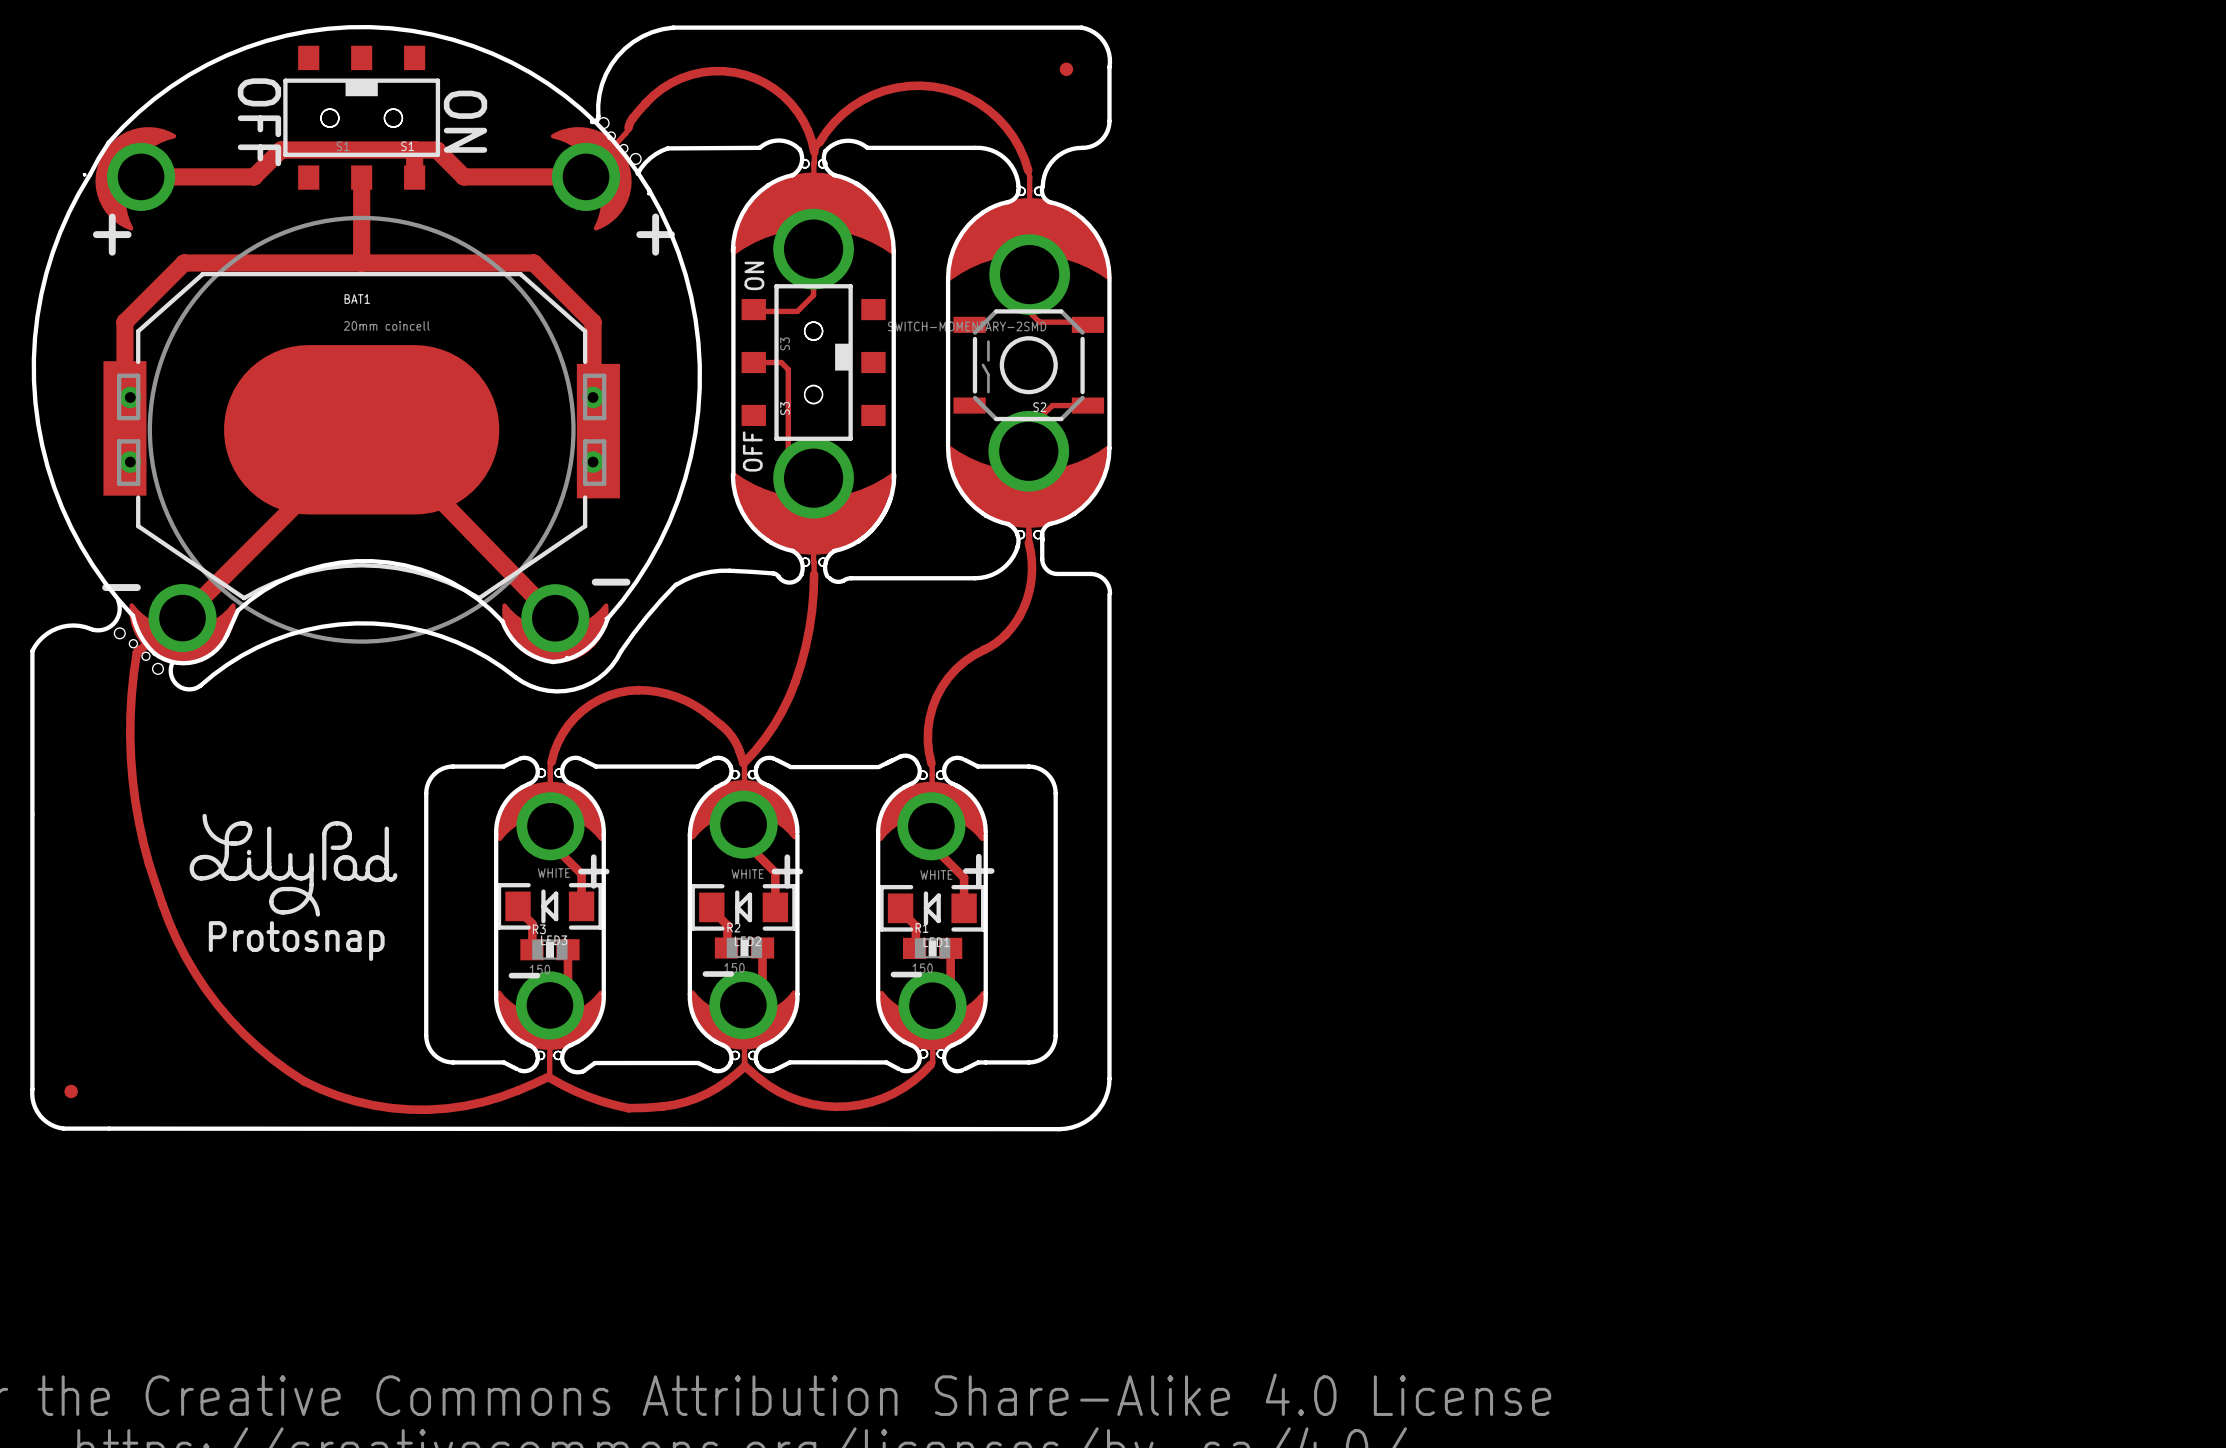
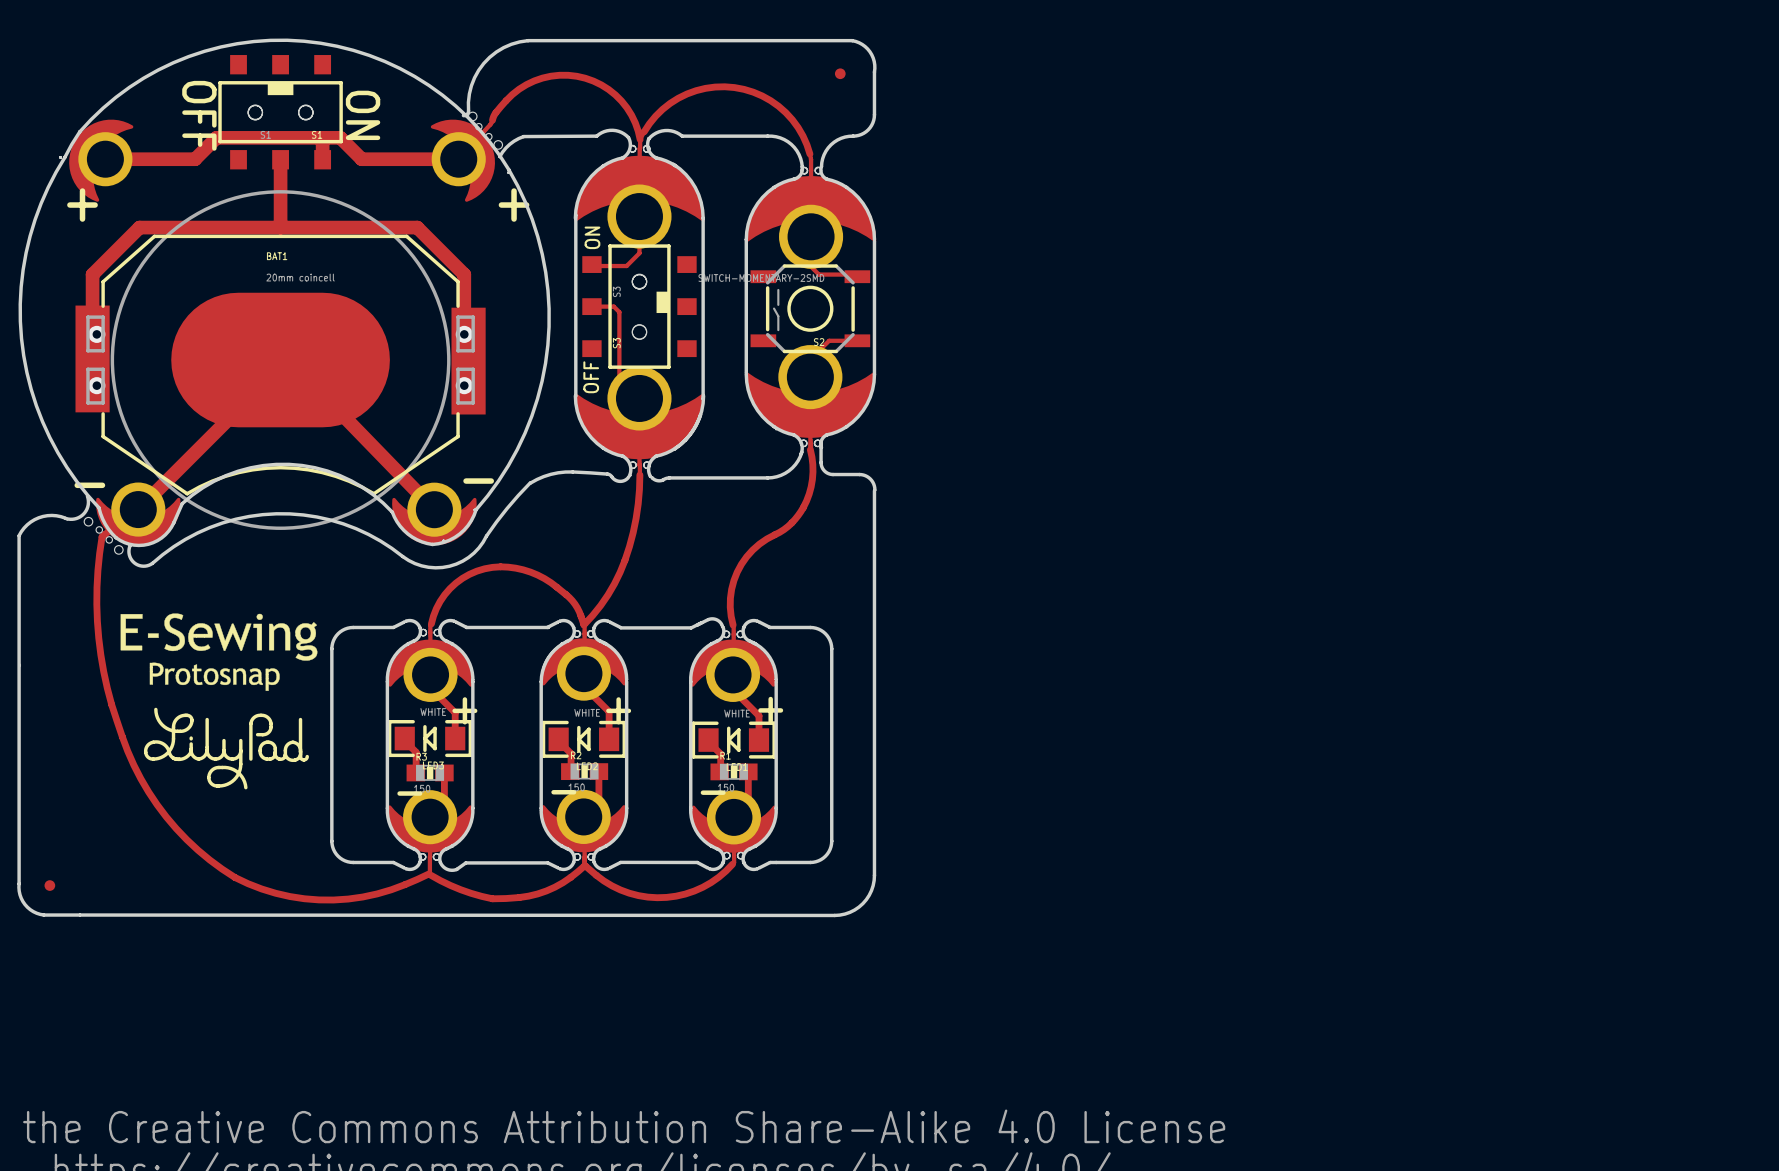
drawing: none -> [120, 613, 318, 691]
drawing position: (293, 865) -> (226, 748)
text: Protosnap (296, 941) -> none

